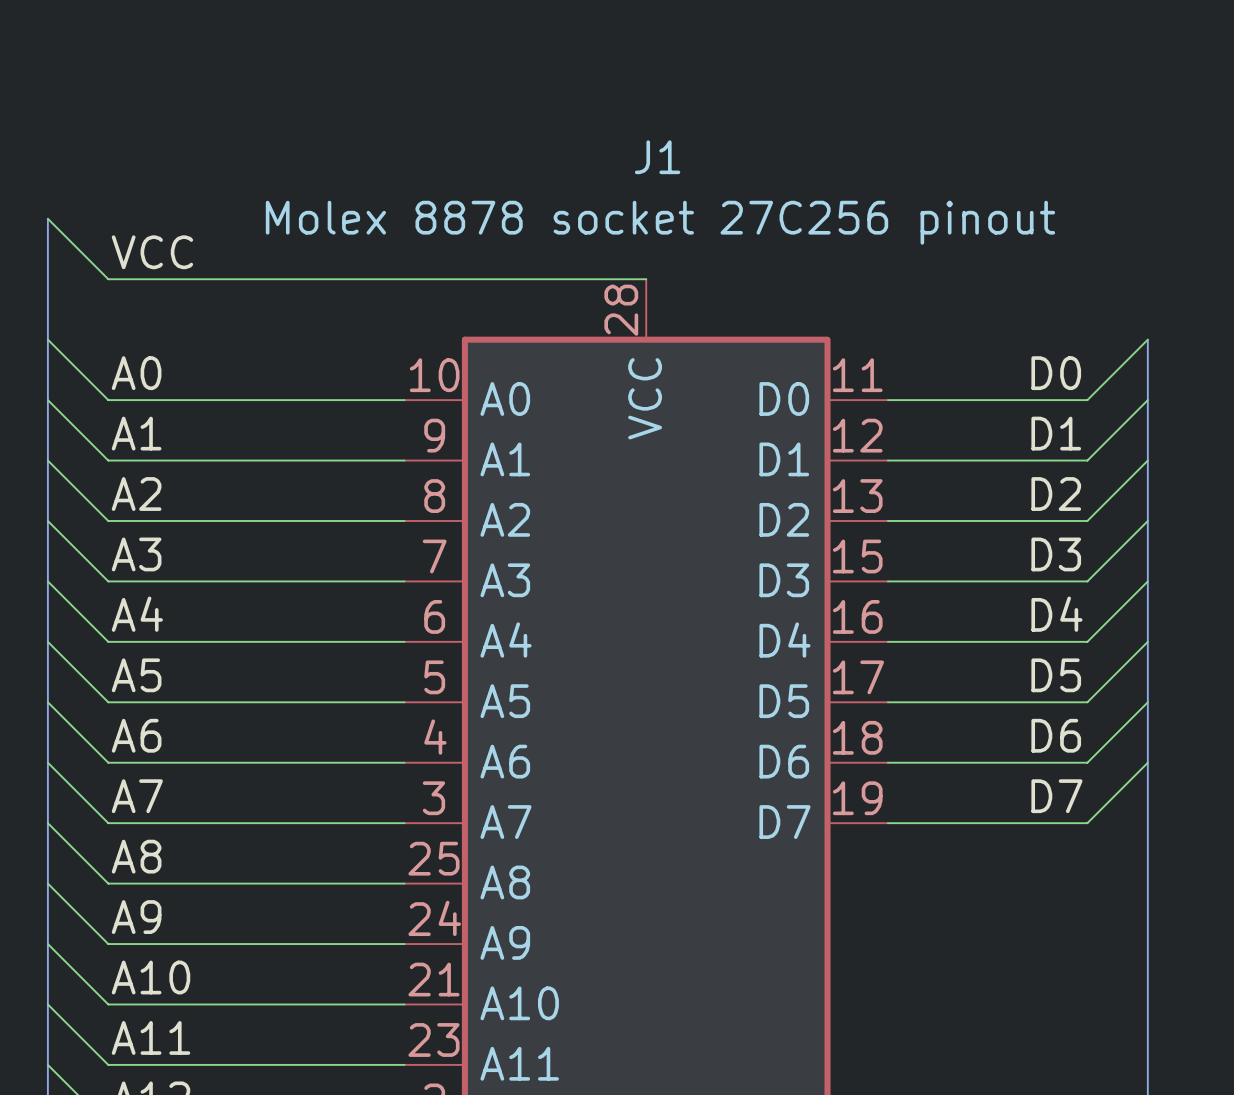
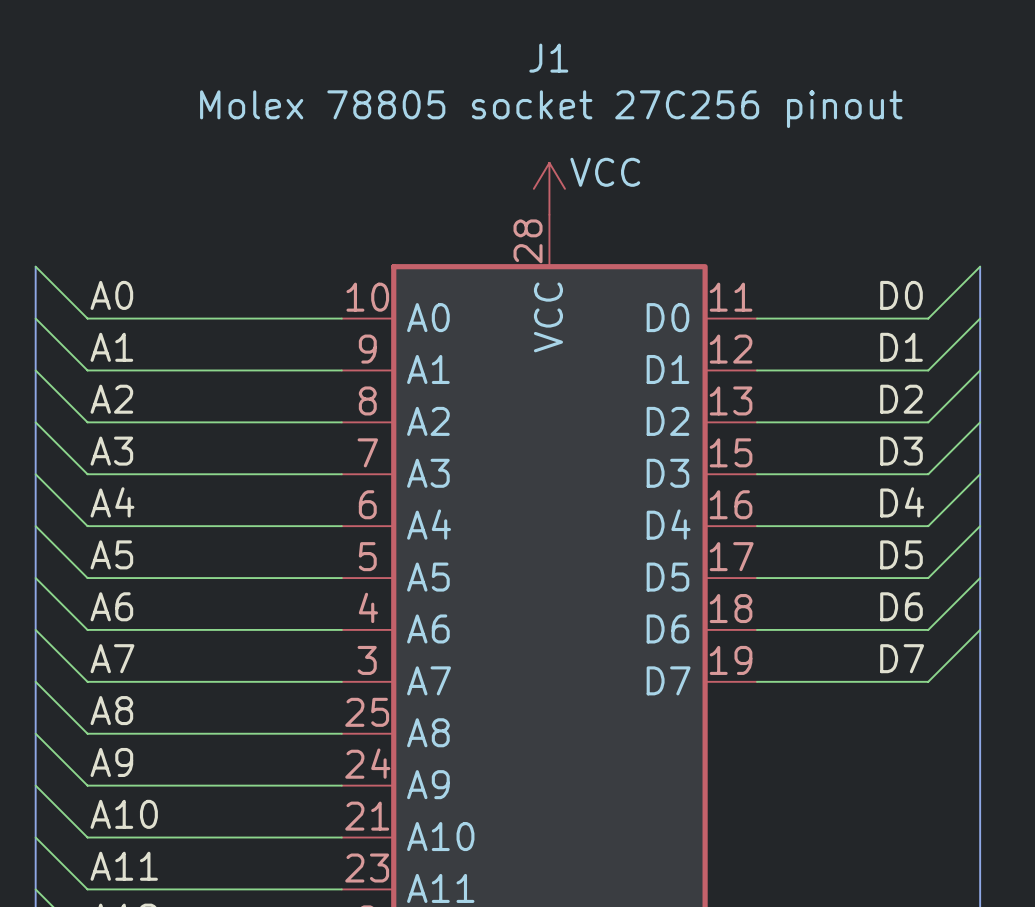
J1 name position: J1 (657, 157) -> J1 (548, 58)
wire: (47, 218) (108, 279) (646, 279) -> none
bus: (47, 218) (47, 339) -> none
J1 value: Molex 8878 socket 27C256 pinout (660, 222) -> Molex 78805 socket 27C256 pinout (551, 109)
power symbol: none -> VCC (549, 188)
label: VCC (152, 252) -> none

